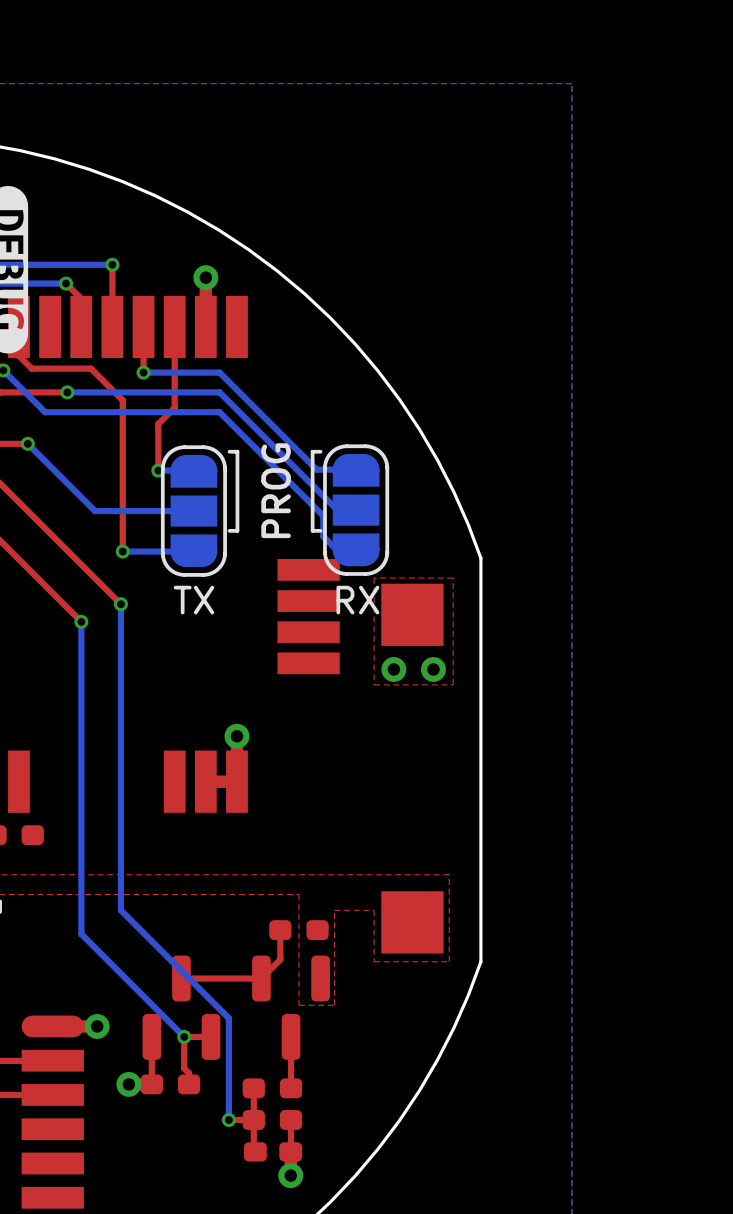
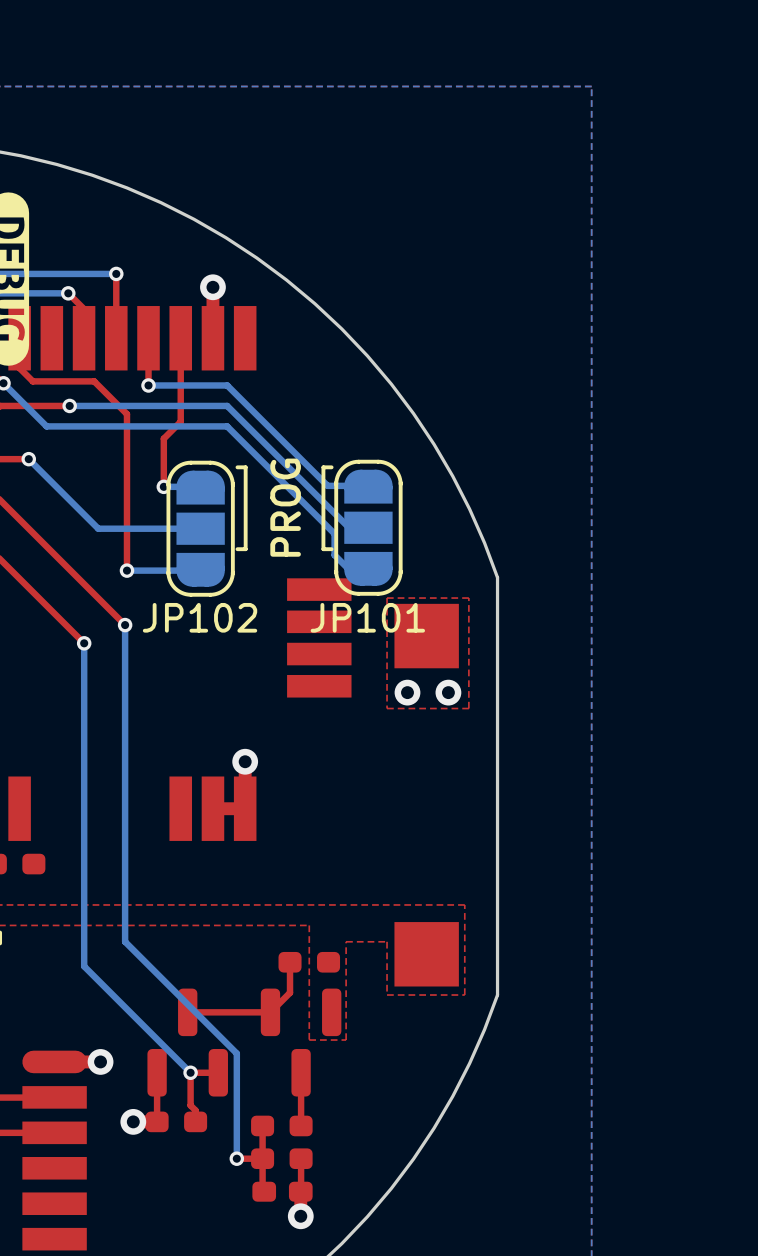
JP102 name: none -> JP102 (200, 617)
JP101 name: none -> JP101 (367, 617)
JP102 value: TX (193, 600) -> none
JP101 value: RX (357, 600) -> none

